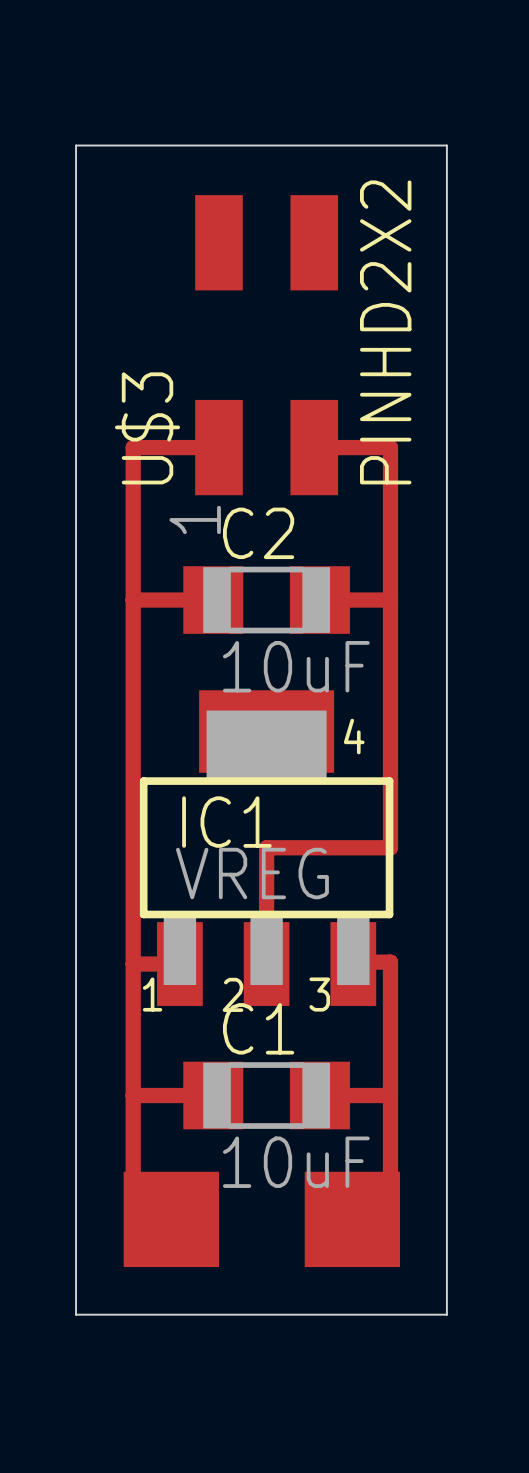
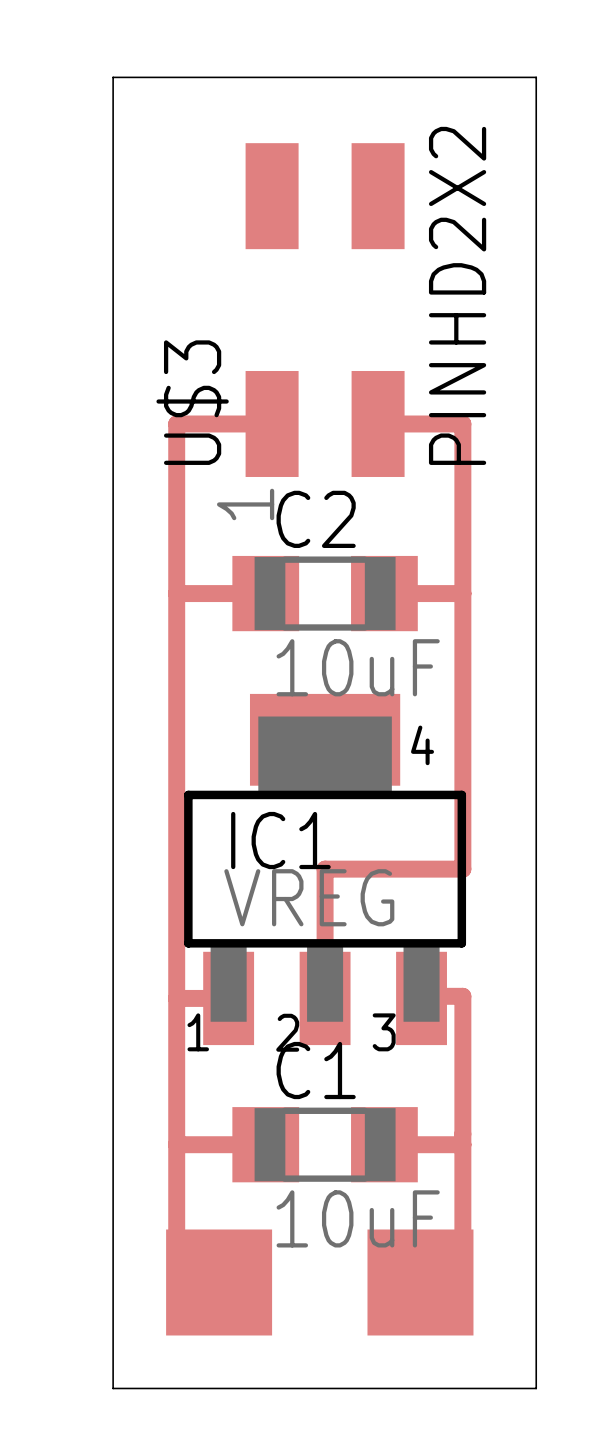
board edge: (76, 145) (446, 145) (446, 1314) -> (113, 87) (113, 77) (536, 77) (536, 1388) (525, 1388)

